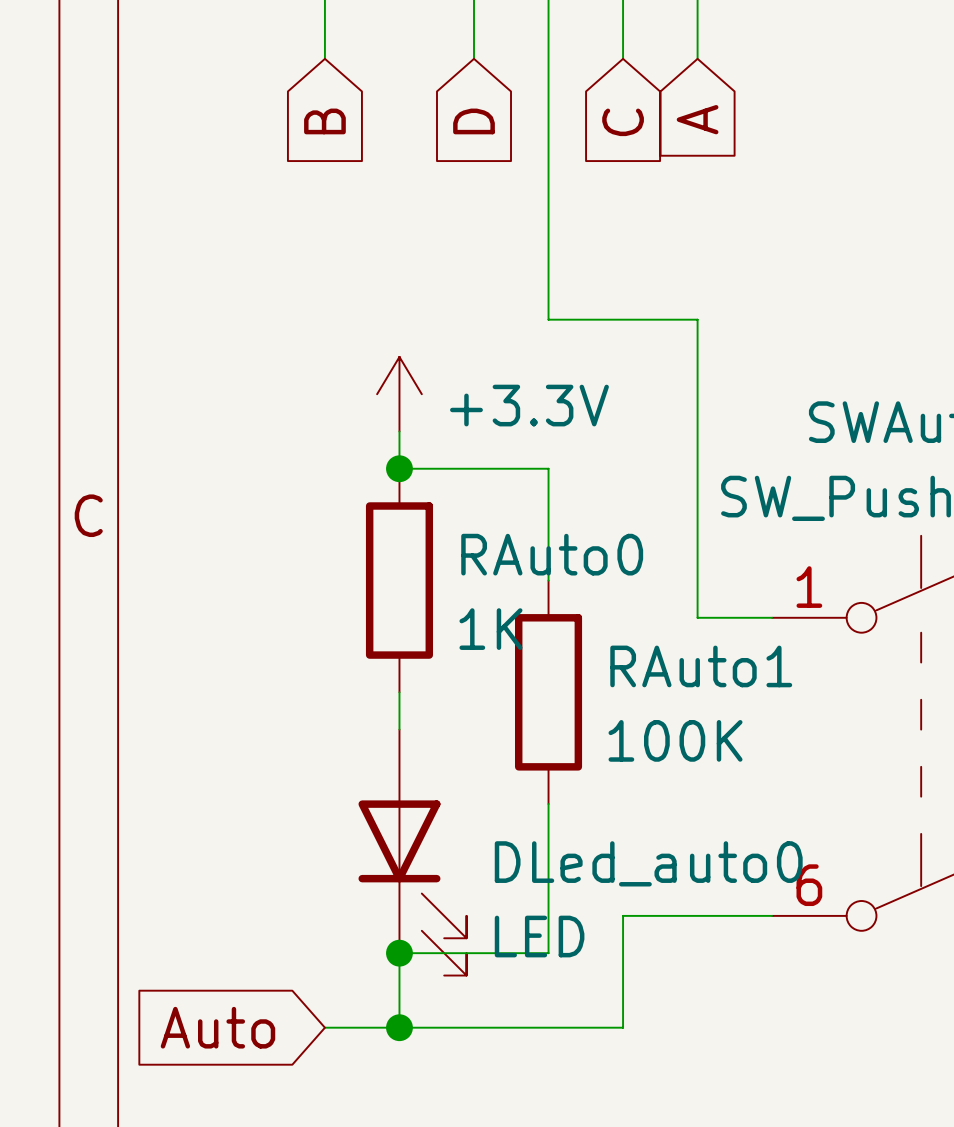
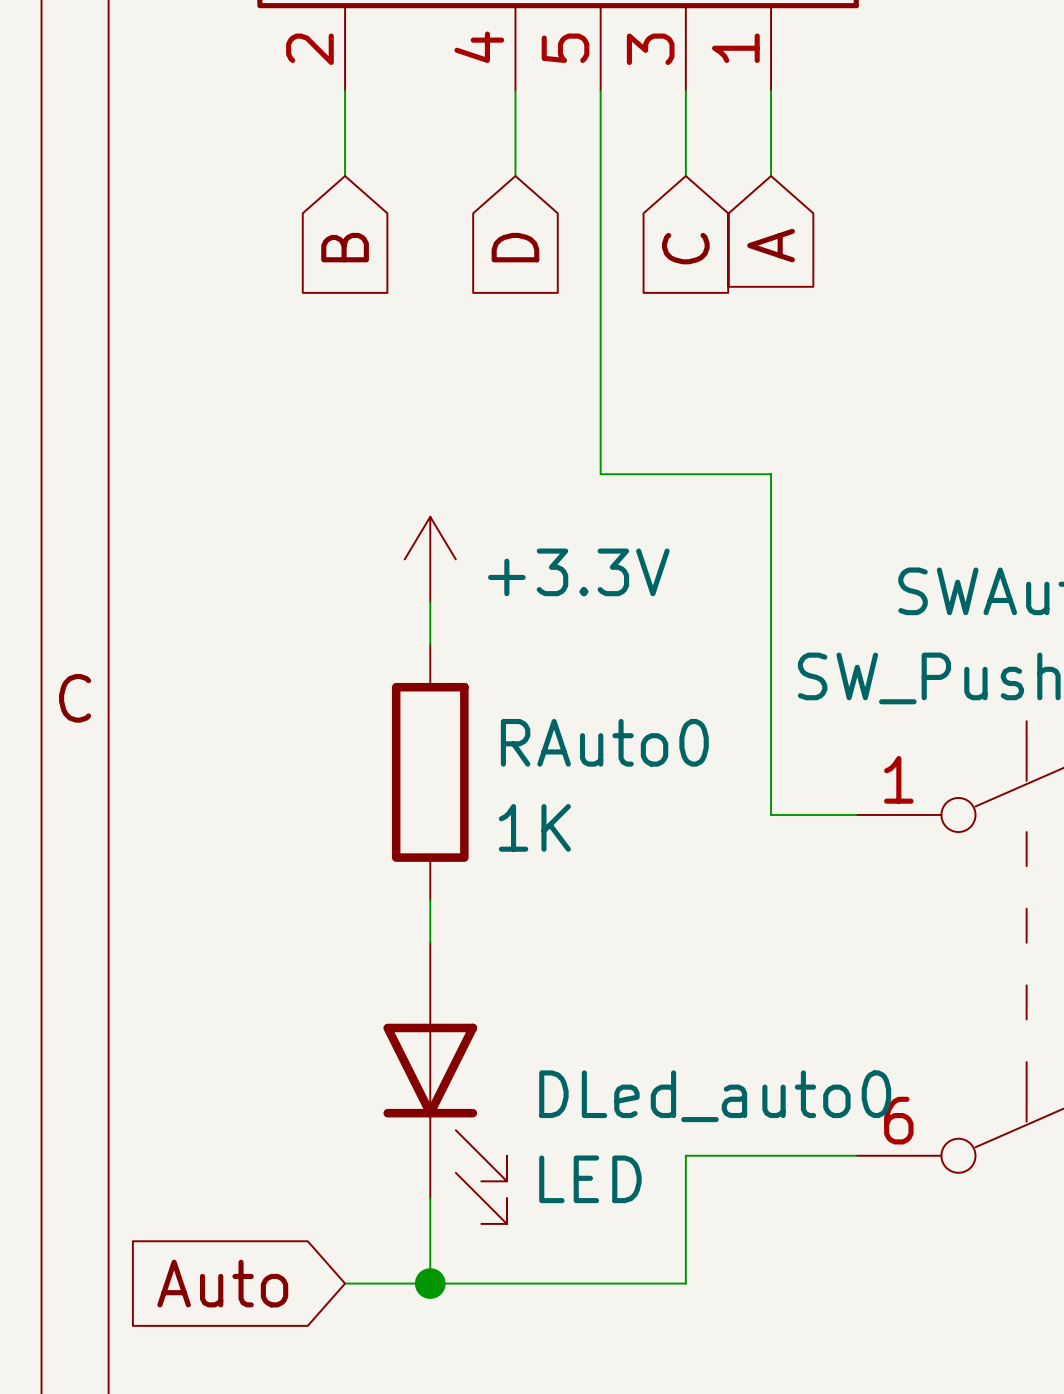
wire: (399, 468) (548, 468) (548, 580) -> none
junction: (399, 468) -> none
RAuto1: 100K (548, 692) -> none
wire: (548, 804) (548, 953) (399, 953) -> none
junction: (399, 953) -> none

